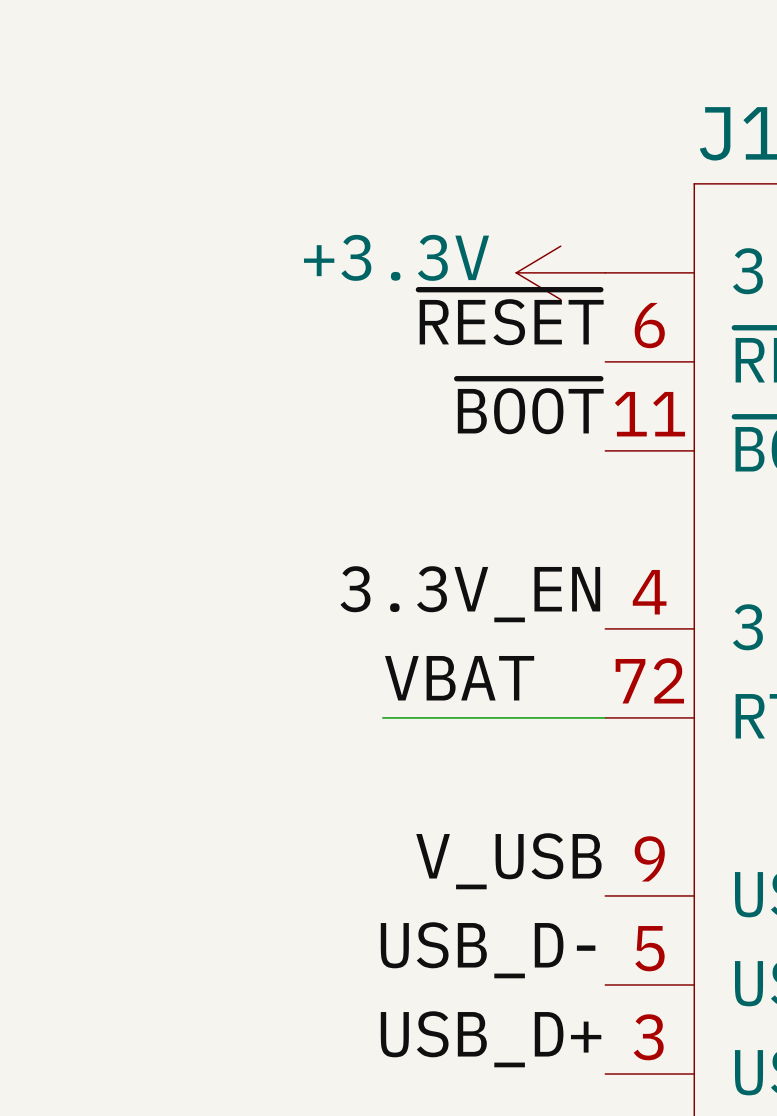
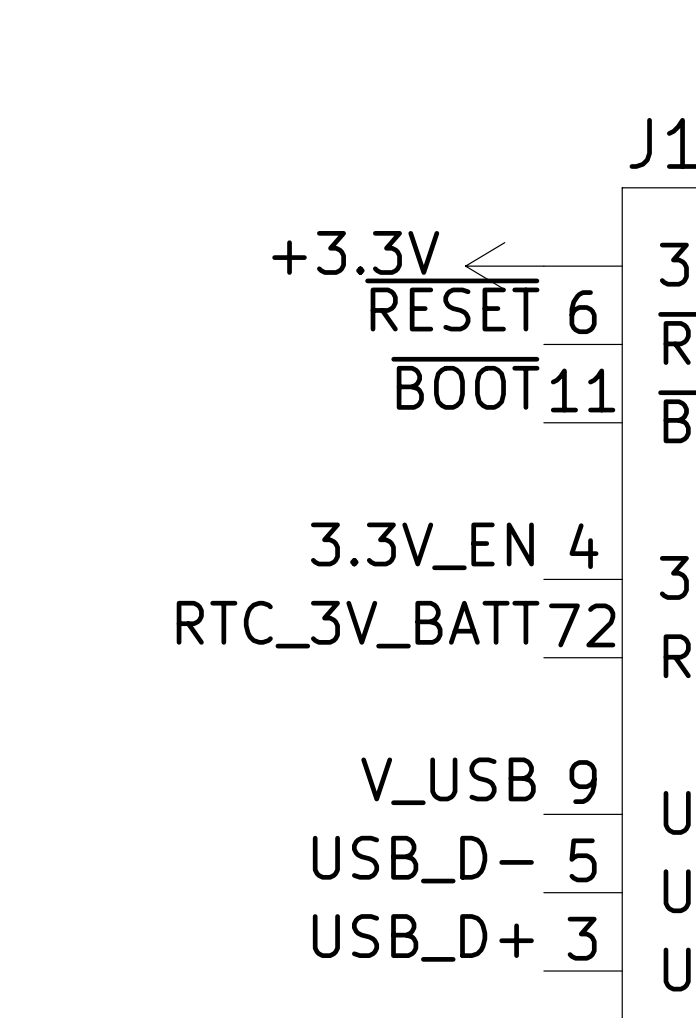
label: VBAT (459, 678) -> none
label: none -> RTC_3V_BATT (358, 624)
wire: (382, 717) (605, 717) -> none

